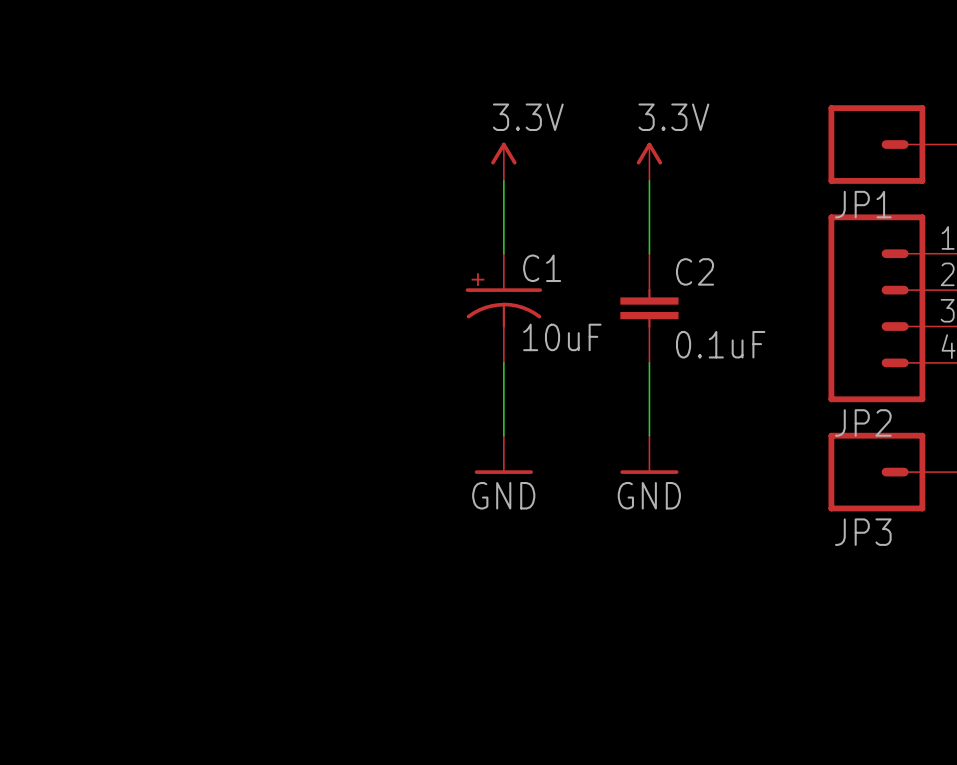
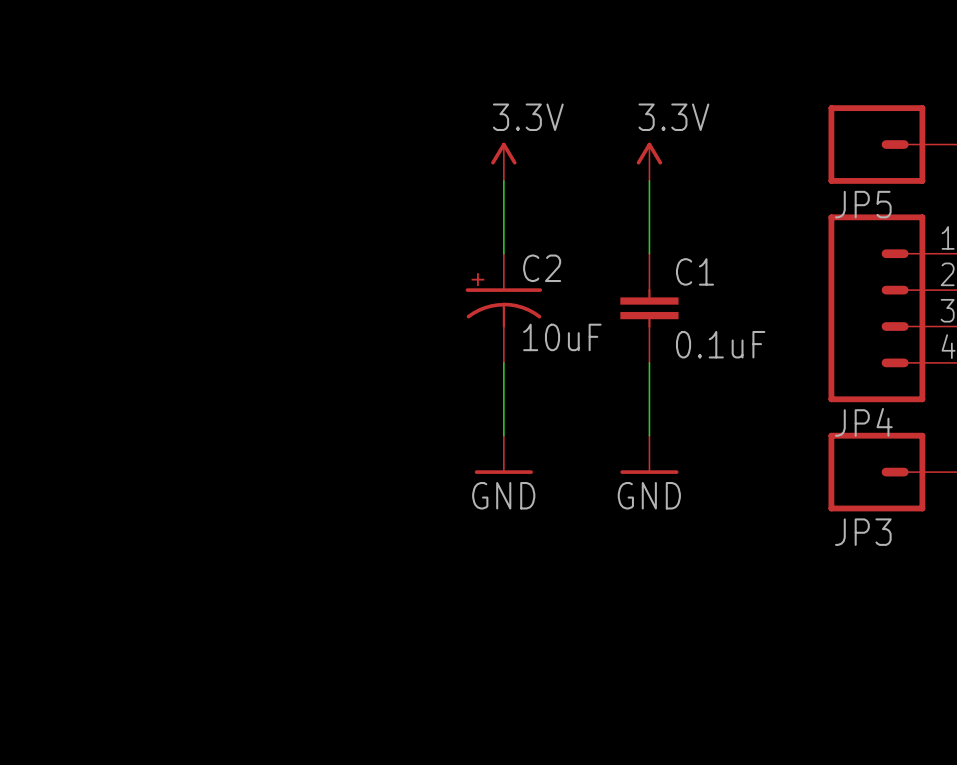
JP1 name: JP1 (863, 204) -> JP5 (863, 204)
C1 name: C1 (542, 268) -> C2 (542, 268)
C2 name: C2 (695, 271) -> C1 (695, 271)
JP2 name: JP2 (863, 422) -> JP4 (863, 422)

